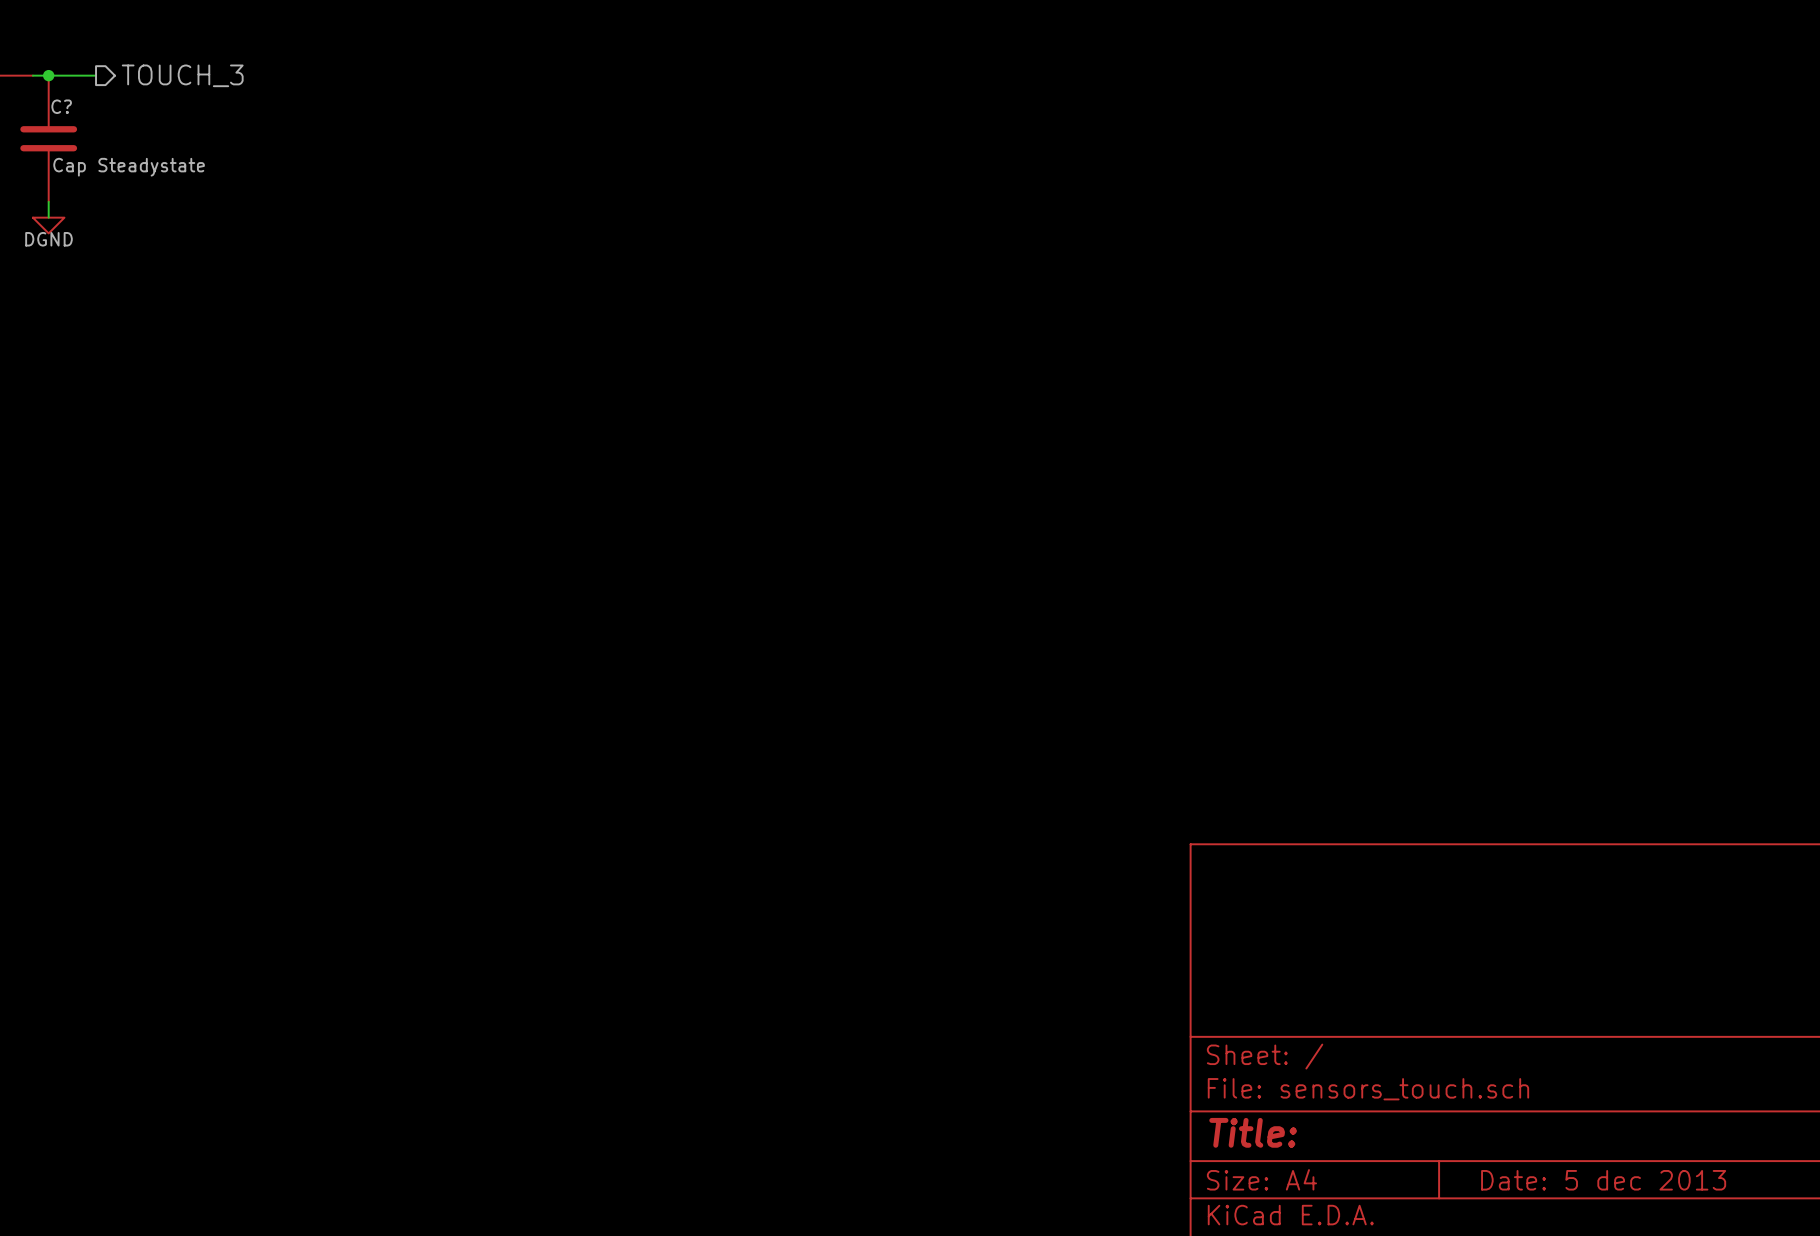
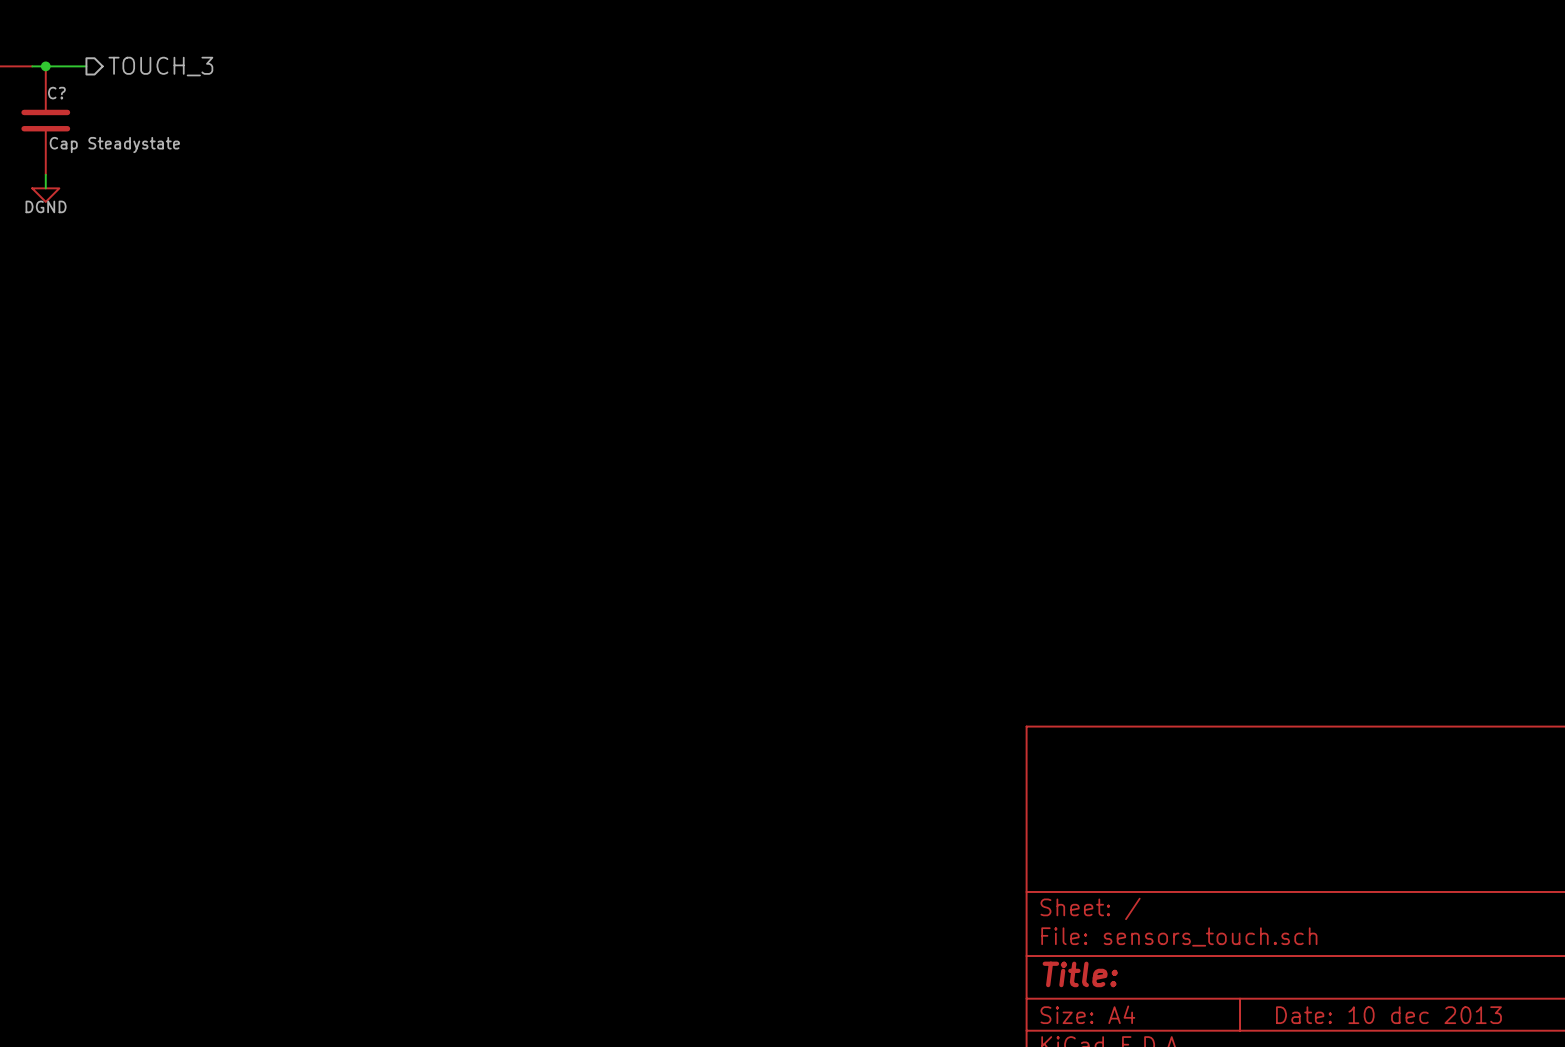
title block: Date: 5 dec 2013 (1603, 1180) -> Date: 10 dec 2013 (1388, 1015)

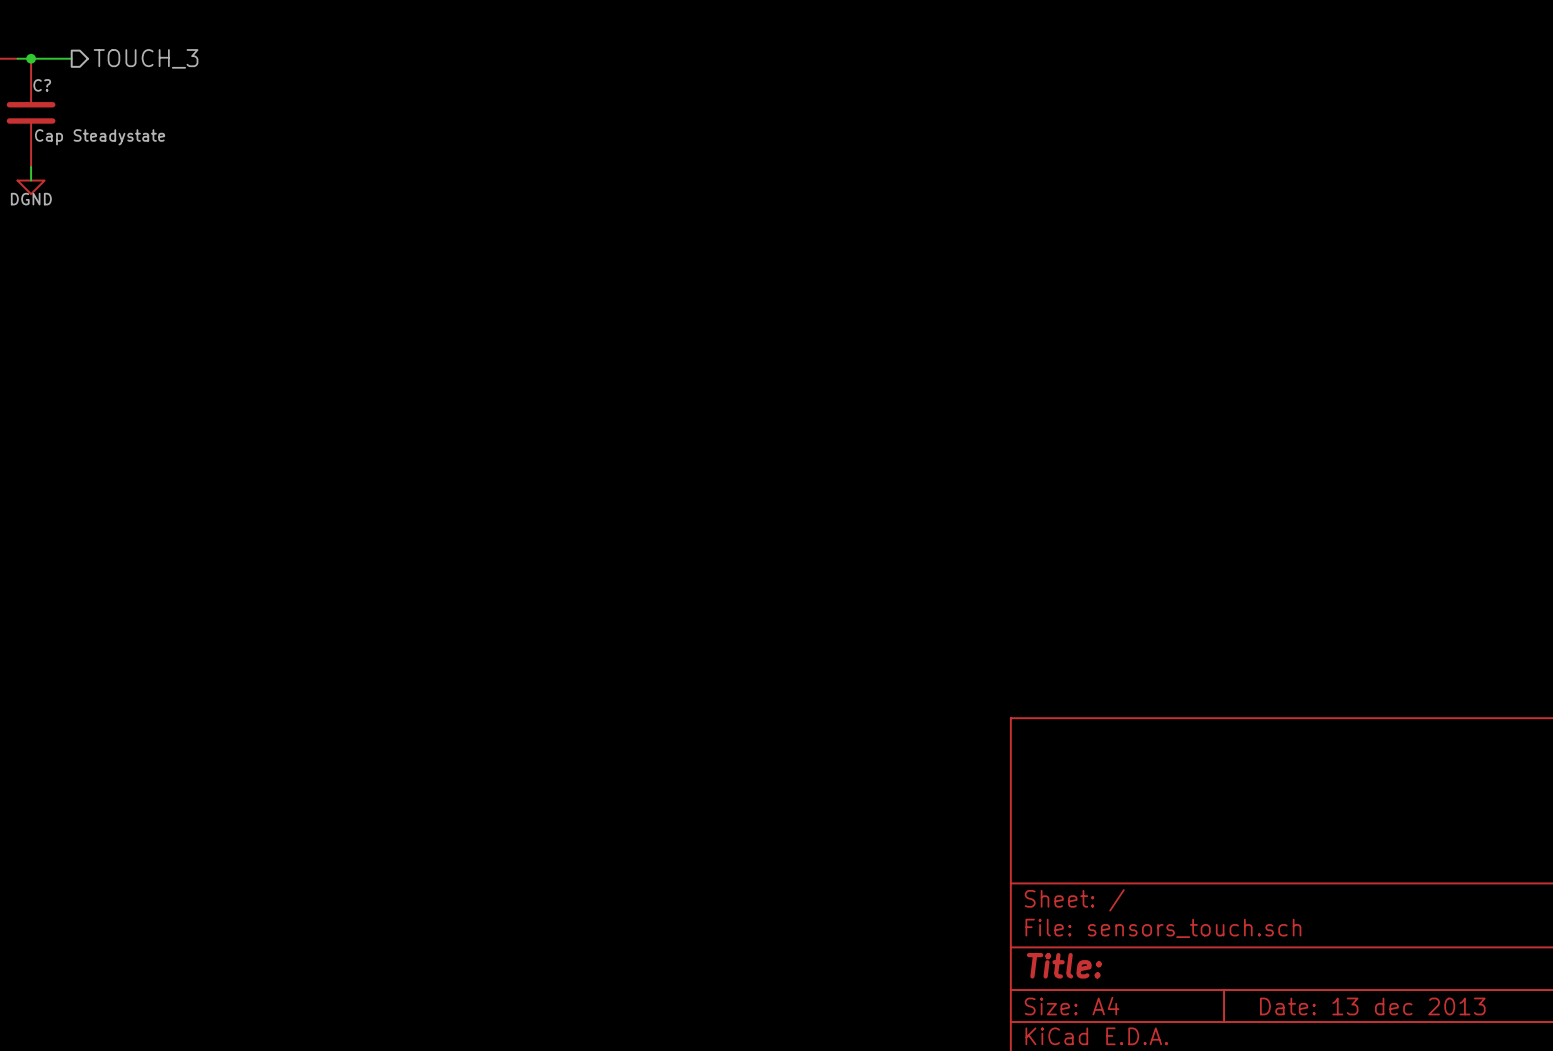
title block: Date: 10 dec 2013 (1388, 1015) -> Date: 13 dec 2013 (1372, 1006)

